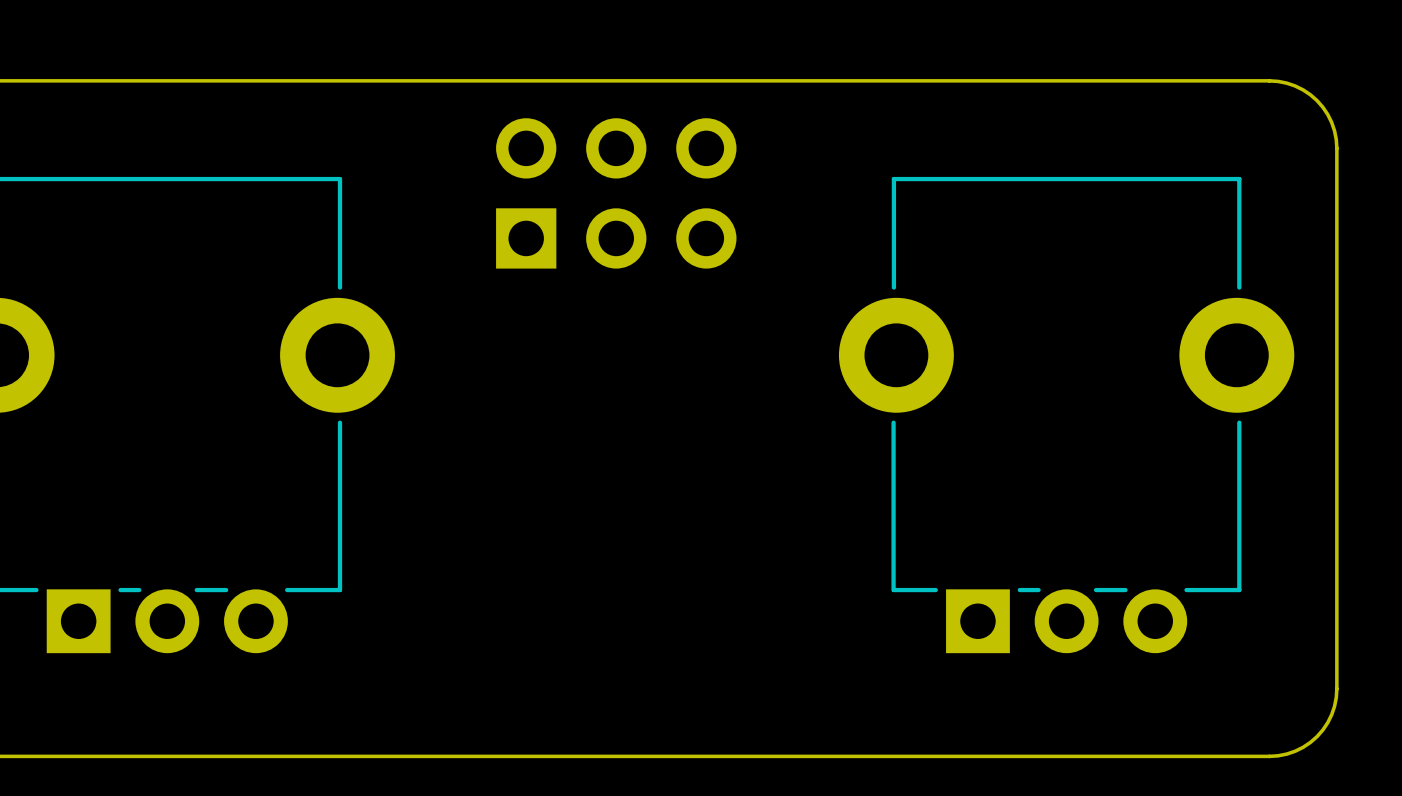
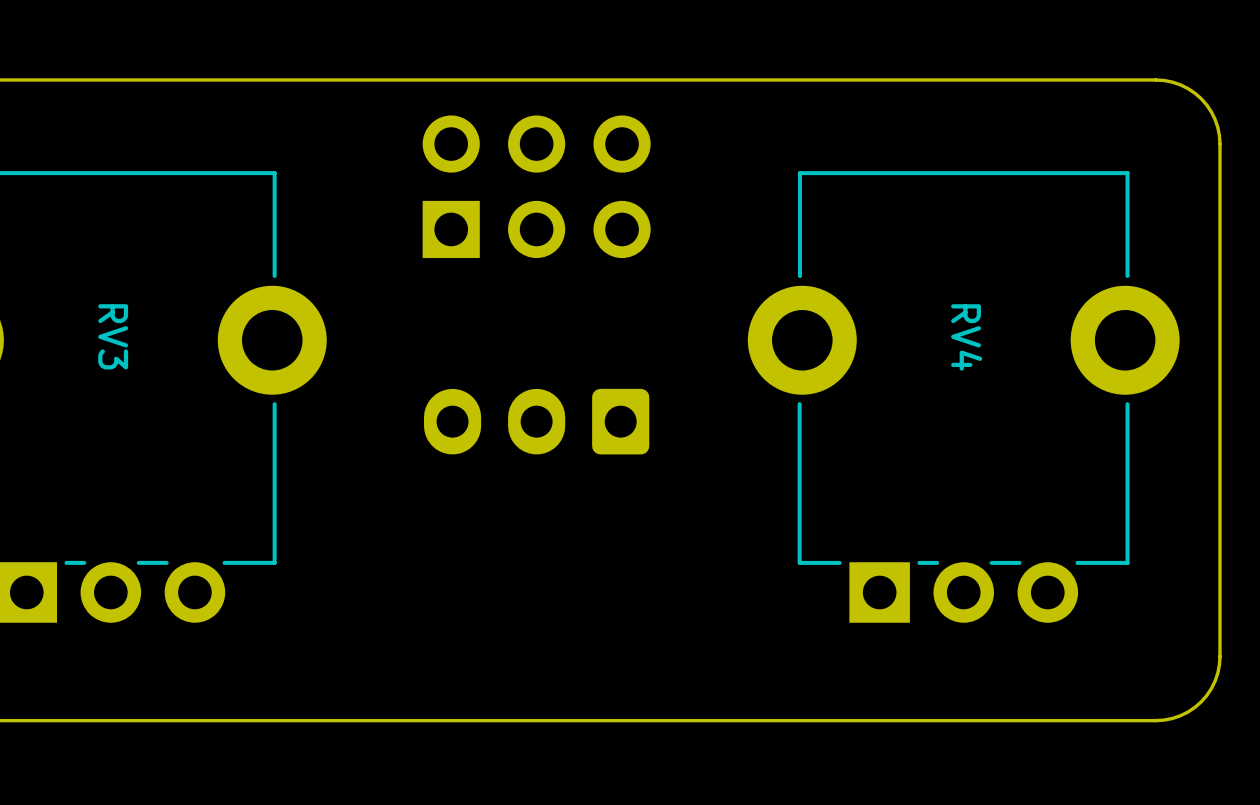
RV3 name: none -> RV3 (113, 336)
RV4 name: none -> RV4 (966, 337)
part: none -> (536, 421)

